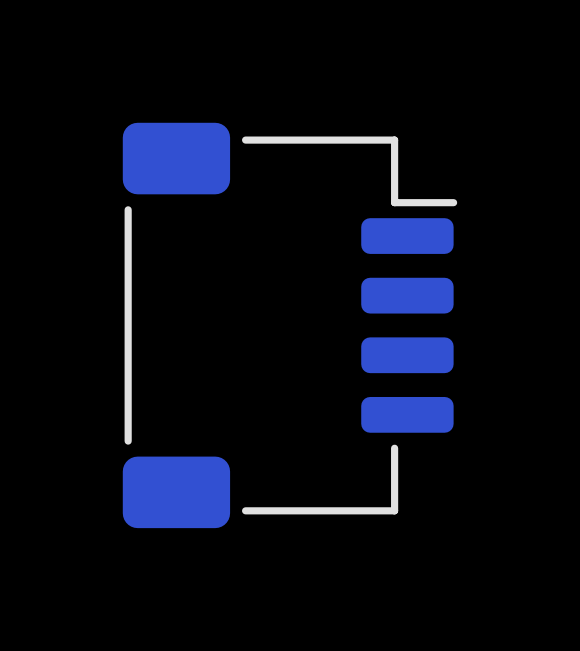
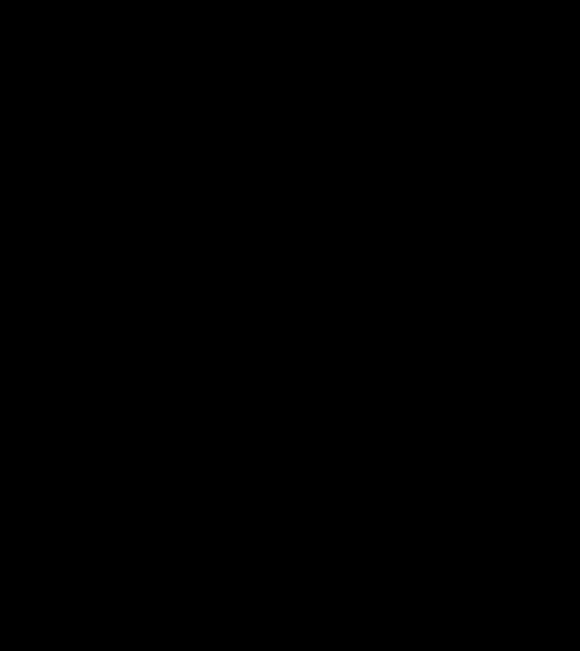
part: (289, 325) -> none

